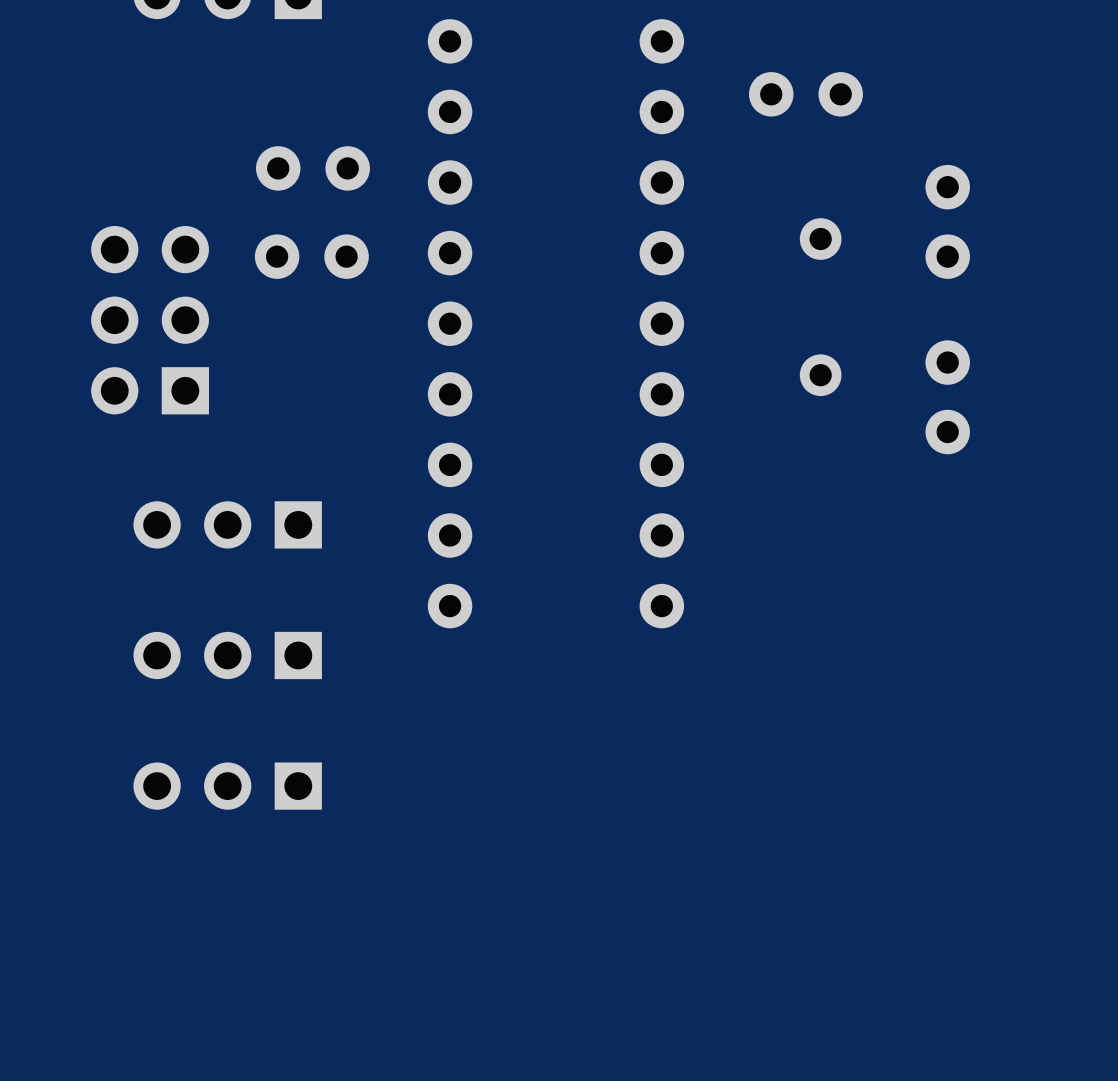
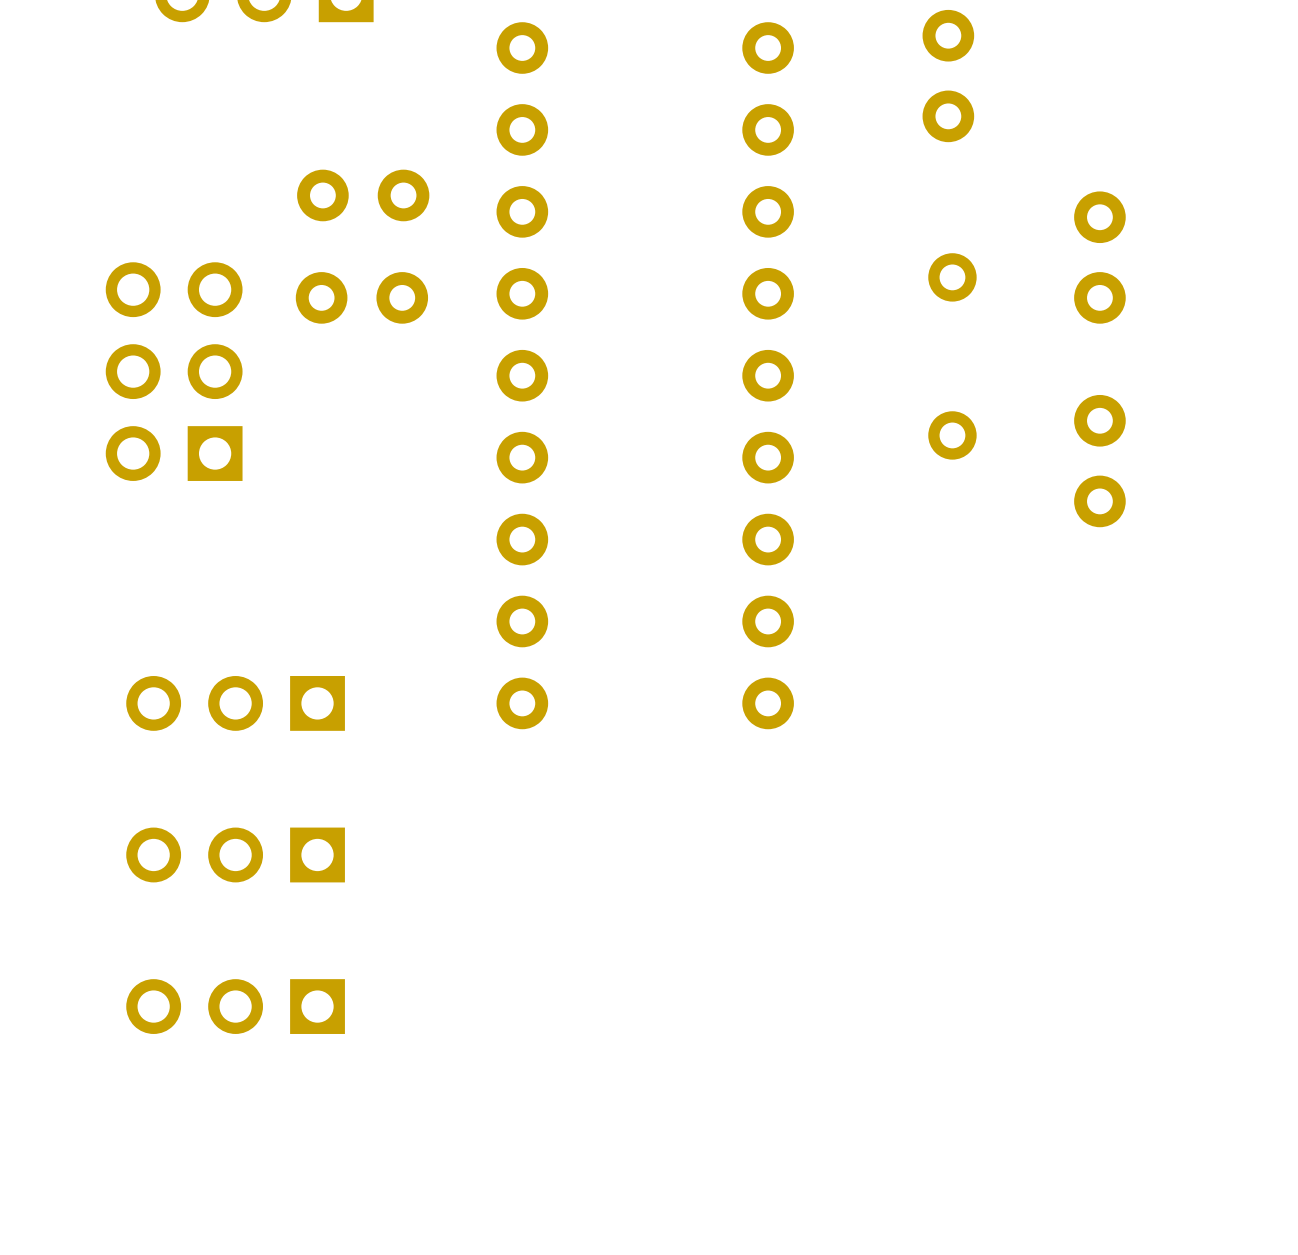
part rotation: 0° (805, 94) -> 90° clockwise (948, 76)
part: (227, 524) -> none
part: none -> (235, 703)
part: (227, 655) -> none
part: none -> (235, 854)
part: (227, 786) -> none
part: none -> (235, 1006)

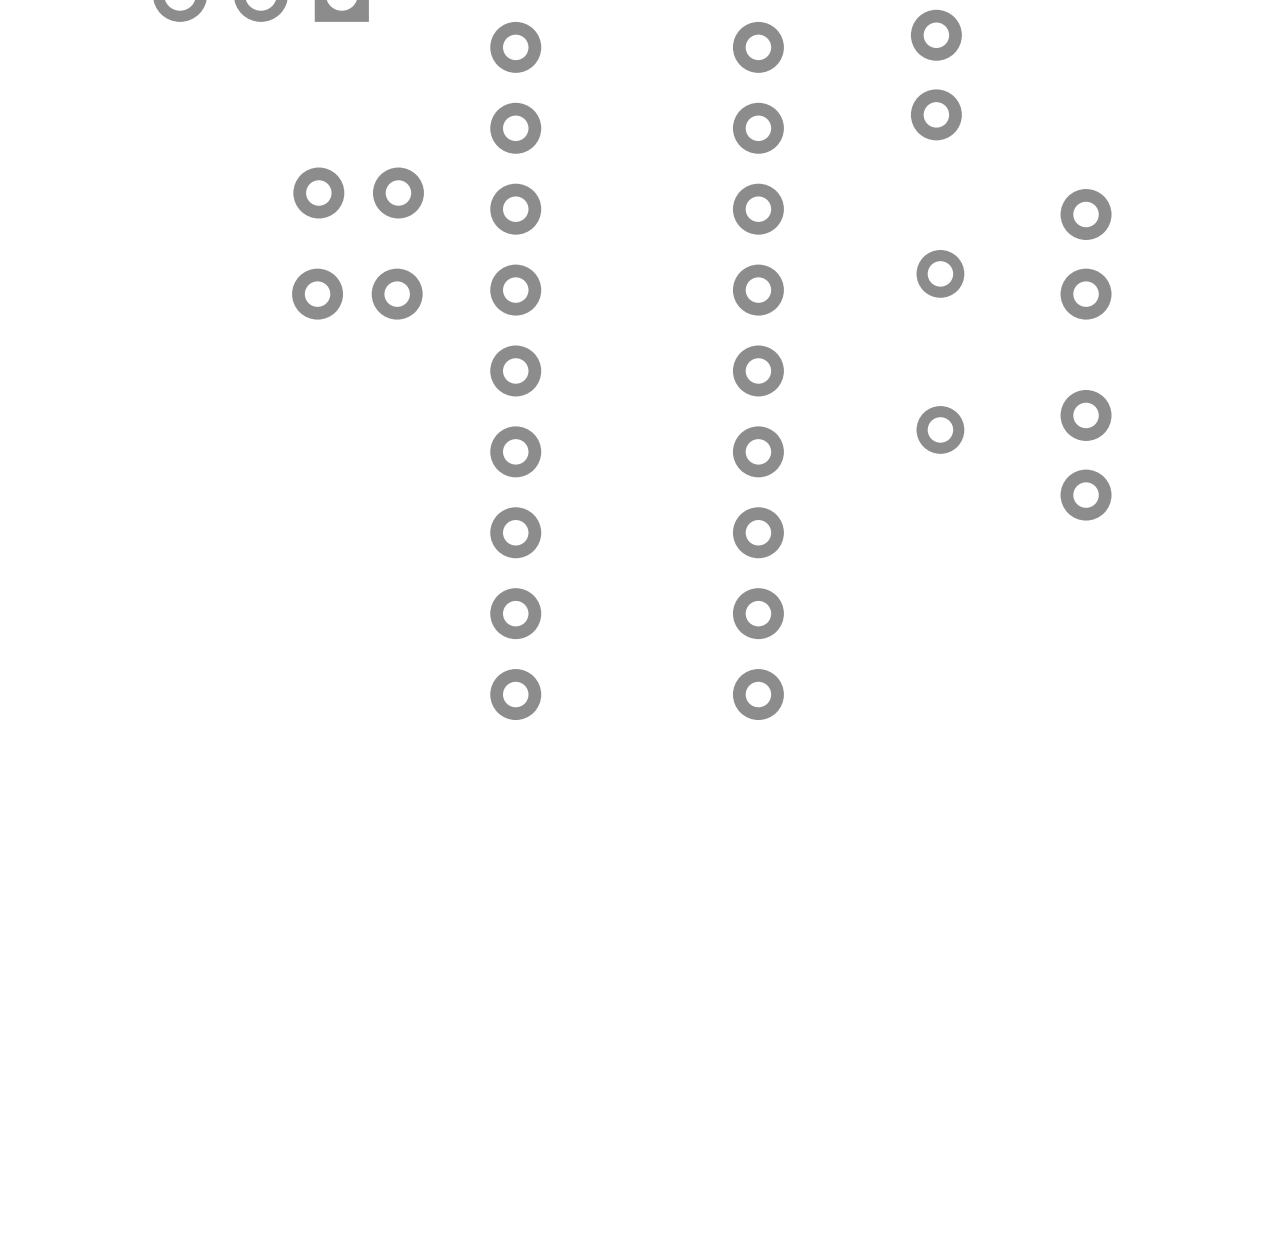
part: (174, 371) -> none
part: (235, 703) -> none
part: (235, 854) -> none
part: (235, 1006) -> none

